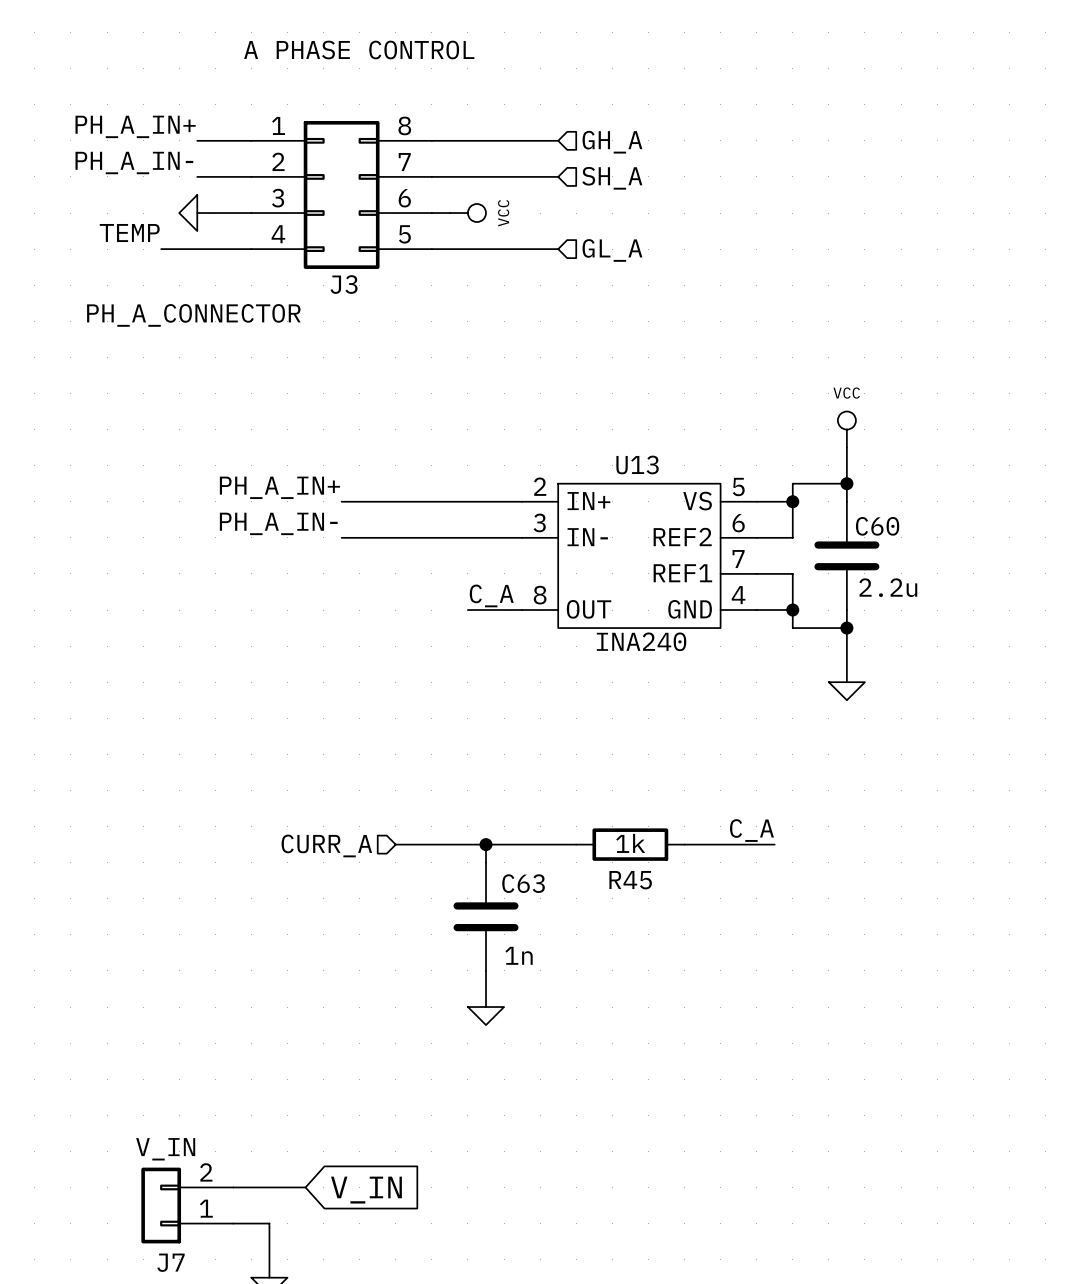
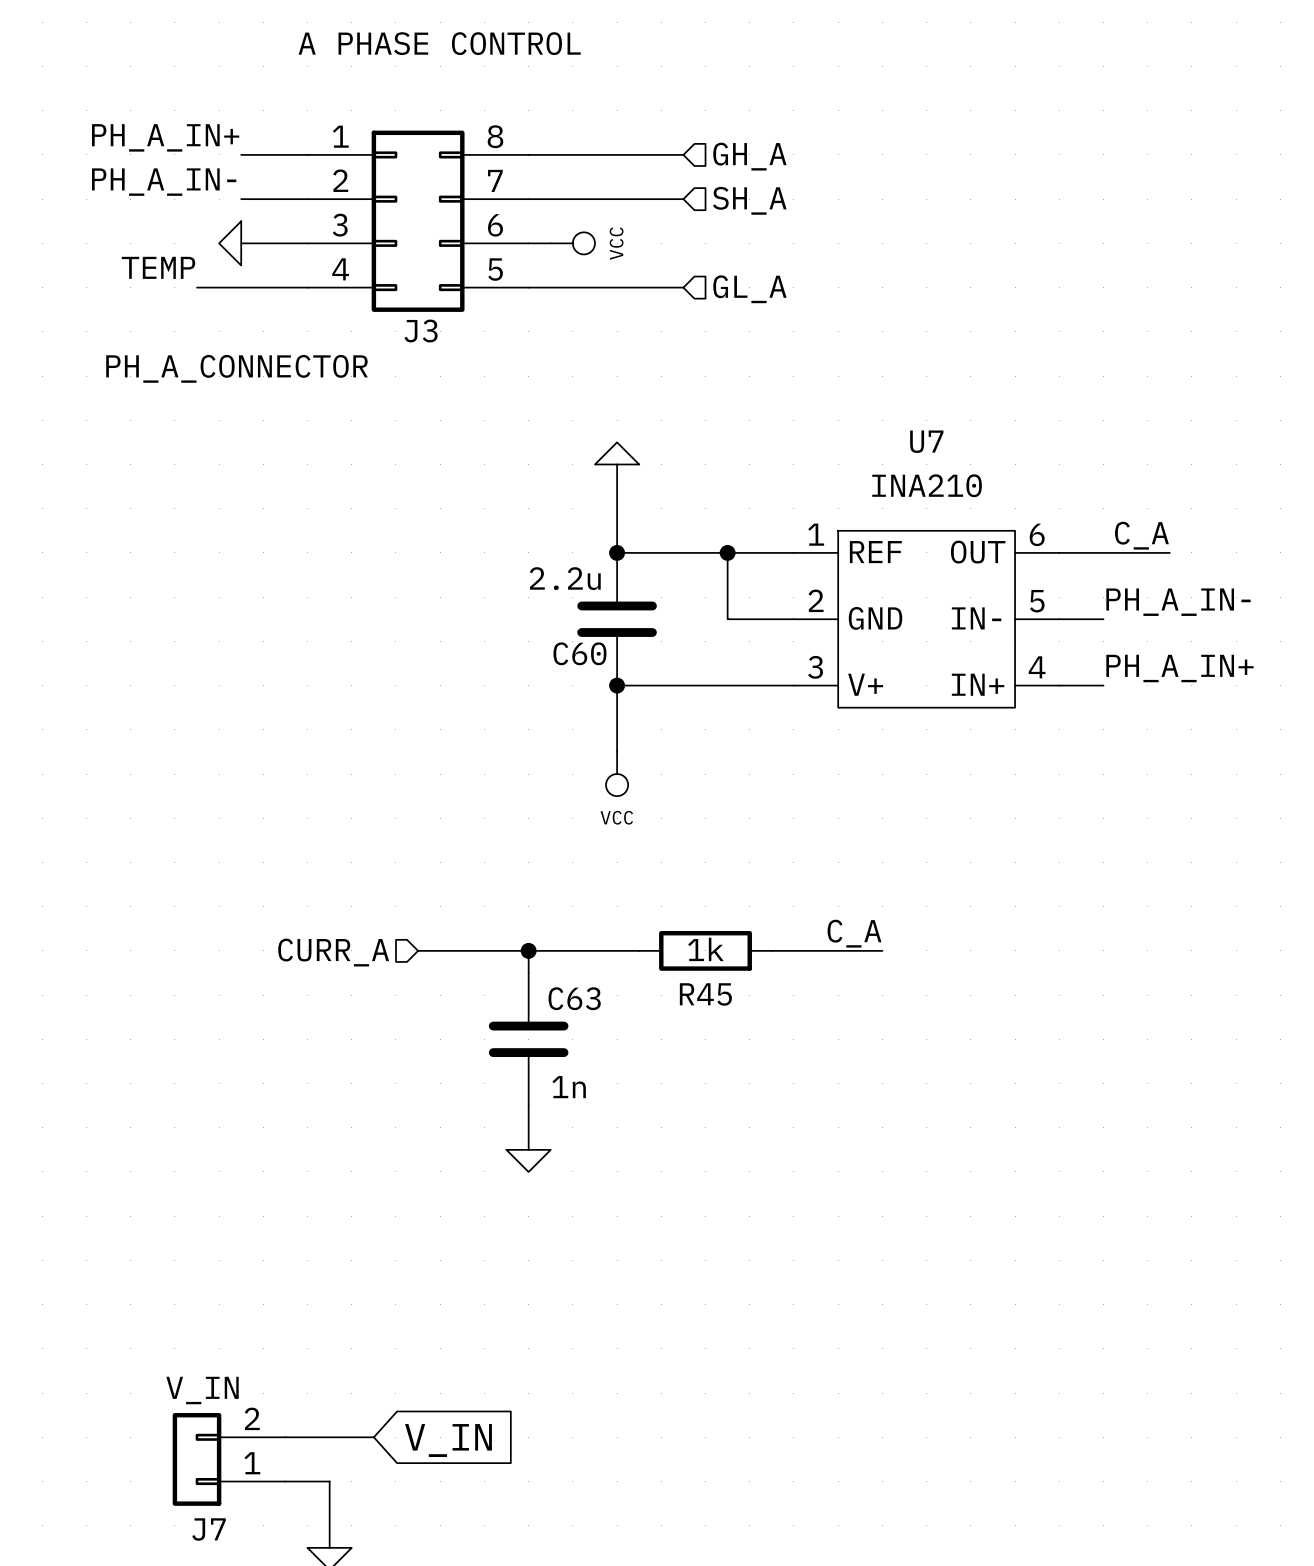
power symbol: none -> (617, 453)
wire: none -> (617, 464) (617, 552) (793, 552)
power symbol: VCC (846, 429) -> none
wire: (846, 447) (846, 501) -> none
label: none -> C_A (1141, 535)
junction: none -> (617, 552)
wire: none -> (727, 552) (727, 619) (793, 619)
junction: none -> (727, 552)
wire: none -> (1059, 552) (1169, 552)
wire: (846, 483) (792, 483) (792, 537) (756, 537) -> none
junction: (846, 483) -> none
label: PH_A_IN+ (279, 487) -> none
wire: (341, 501) (522, 501) -> none
wire: (756, 501) (792, 501) -> (1059, 619) (1103, 619)
junction: (792, 501) -> none
label: none -> PH_A_IN- (1178, 602)
U7: none -> INA210 (926, 619)
label: PH_A_IN- (278, 523) -> none
C60 name position: C60 (877, 526) -> C60 (579, 653)
wire: (341, 537) (522, 537) -> none
U13: INA240 (639, 555) -> none
C60 position: (846, 555) -> (617, 619)
label: none -> PH_A_IN+ (1179, 668)
junction: none -> (617, 685)
wire: none -> (793, 685) (617, 685) (617, 751)
wire: (756, 573) (792, 573) (792, 628) (846, 628) -> none
C60 value position: 2.2u (888, 587) -> 2.2u (565, 578)
label: C_A (491, 595) -> none
wire: (467, 610) (522, 610) -> none
wire: (756, 610) (792, 610) -> (1059, 685) (1103, 685)
junction: (792, 610) -> none
wire: (846, 610) (846, 682) -> none
junction: (846, 628) -> none
power symbol: none -> VCC (617, 774)
power symbol: (846, 691) -> none
label position: C_A (751, 830) -> C_A (854, 933)
wire: (395, 844) (576, 844) -> (418, 950) (639, 950)
wire: (486, 844) (486, 862) -> (528, 950) (528, 973)
junction position: (486, 844) -> (528, 950)
R45 position: (630, 844) -> (705, 950)
wire: (684, 844) (774, 844) -> (771, 950) (882, 950)
hierarchical label position: CURR_A (326, 845) -> CURR_A (333, 952)
C63 position: (486, 916) -> (528, 1039)
wire: (486, 970) (486, 1007) -> (528, 1105) (528, 1149)
power symbol position: (486, 1016) -> (528, 1160)

